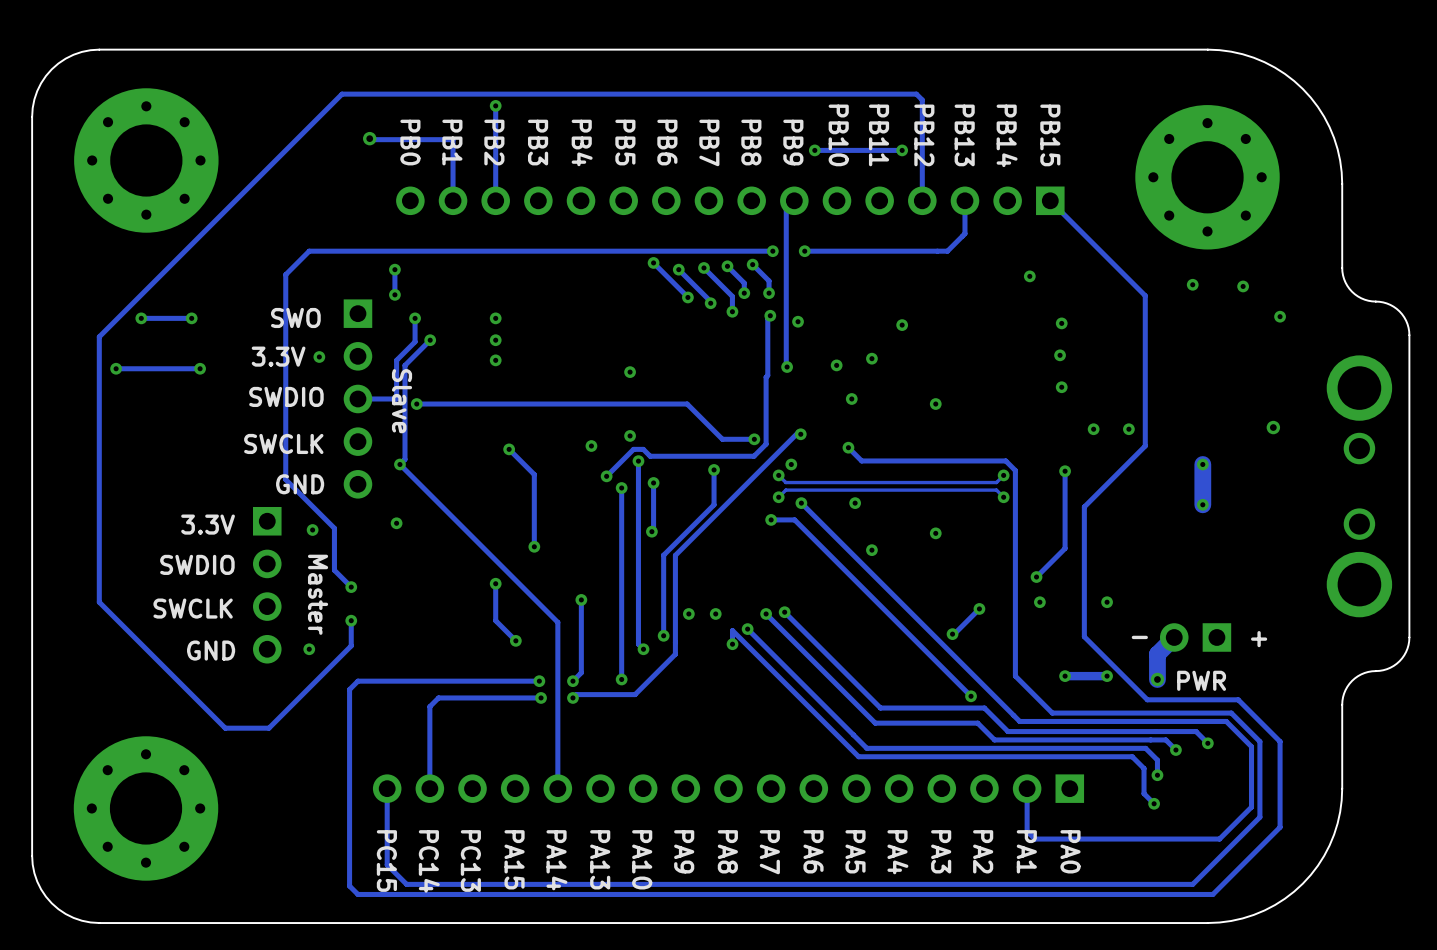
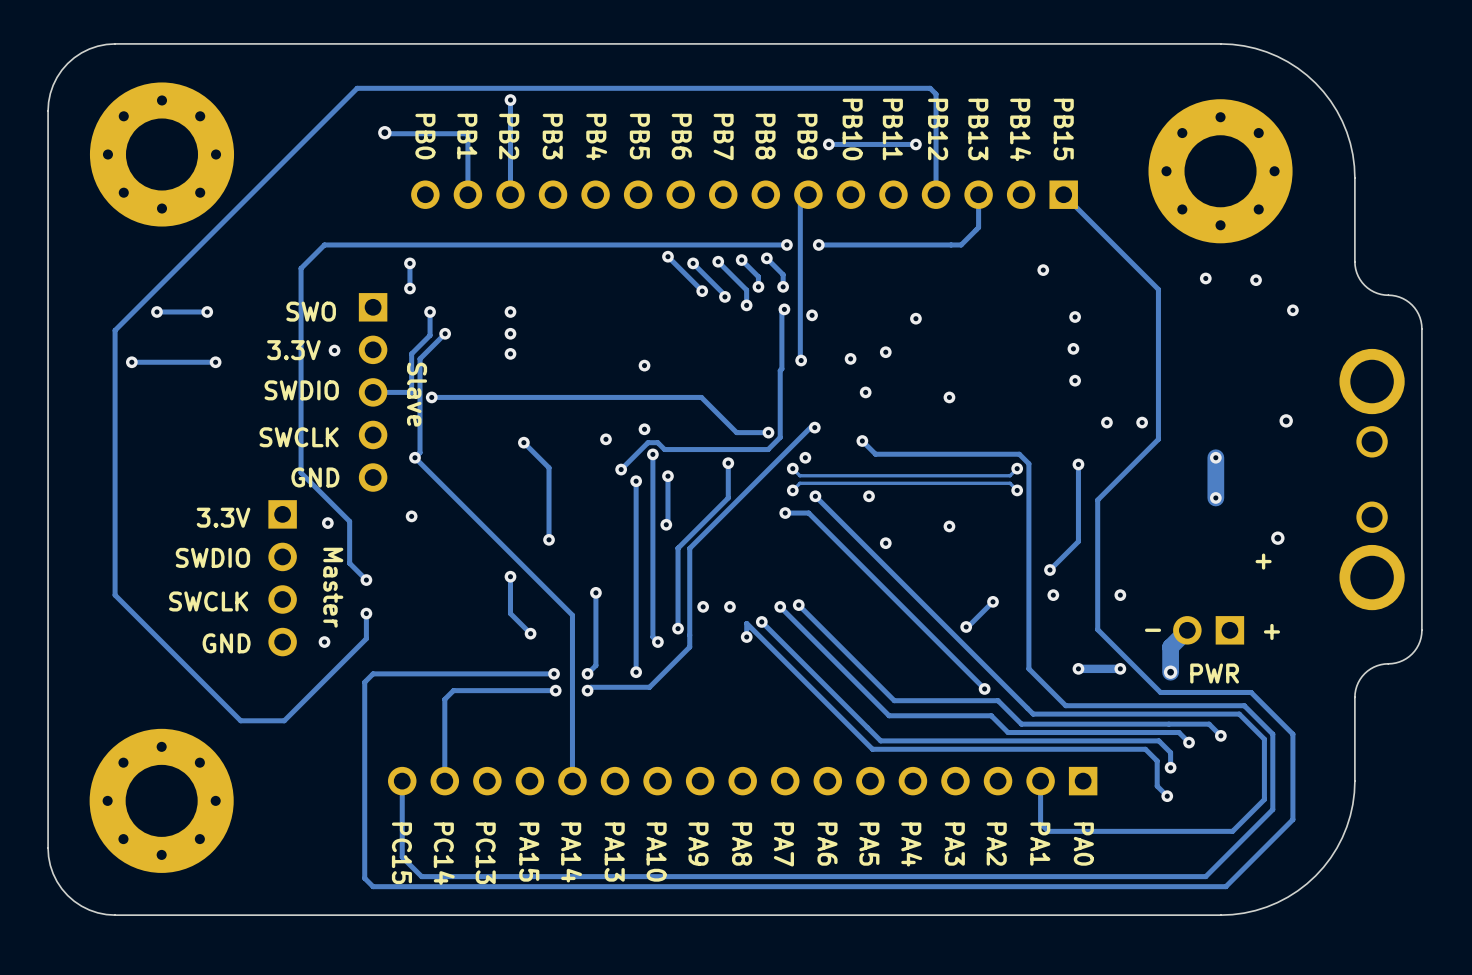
via: none -> (1277, 538)
text: none -> + (1263, 561)

